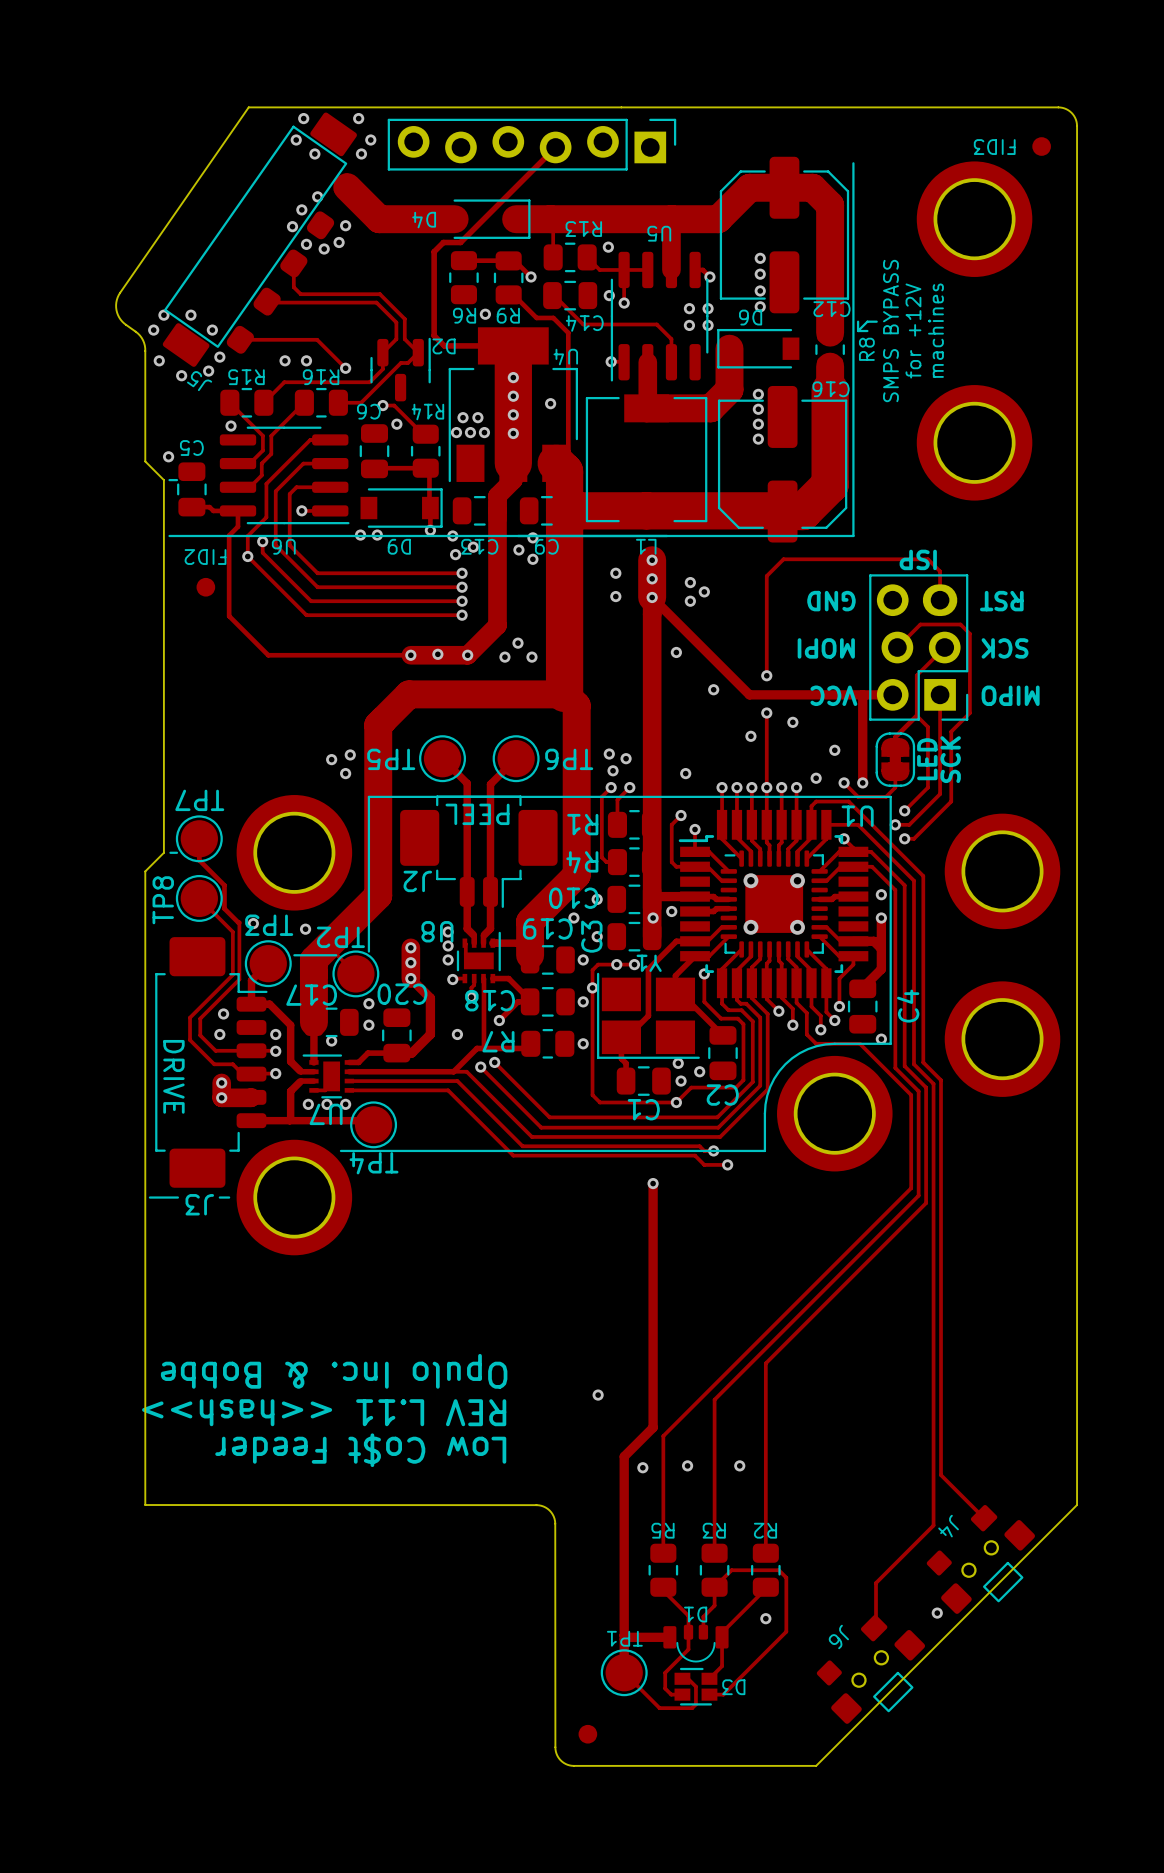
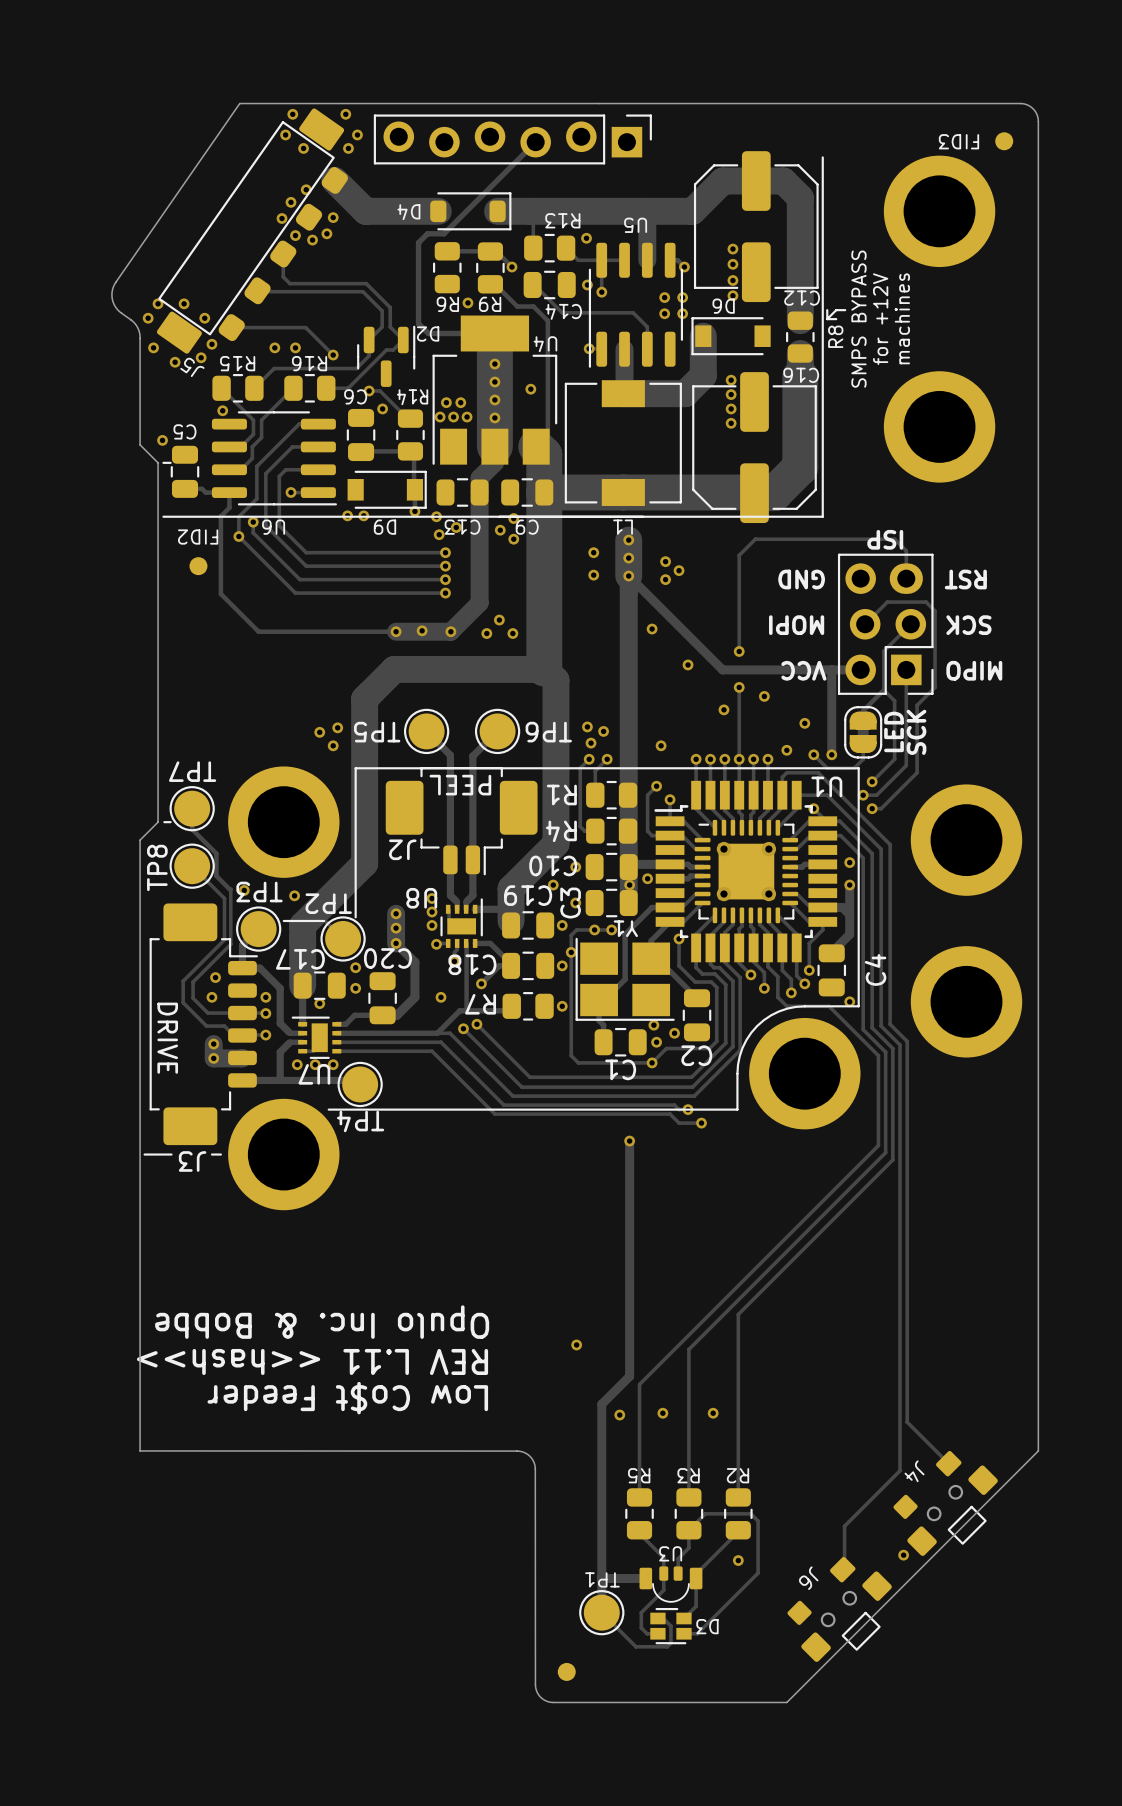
D1 name: D1 (695, 1614) -> U3 (670, 1553)

